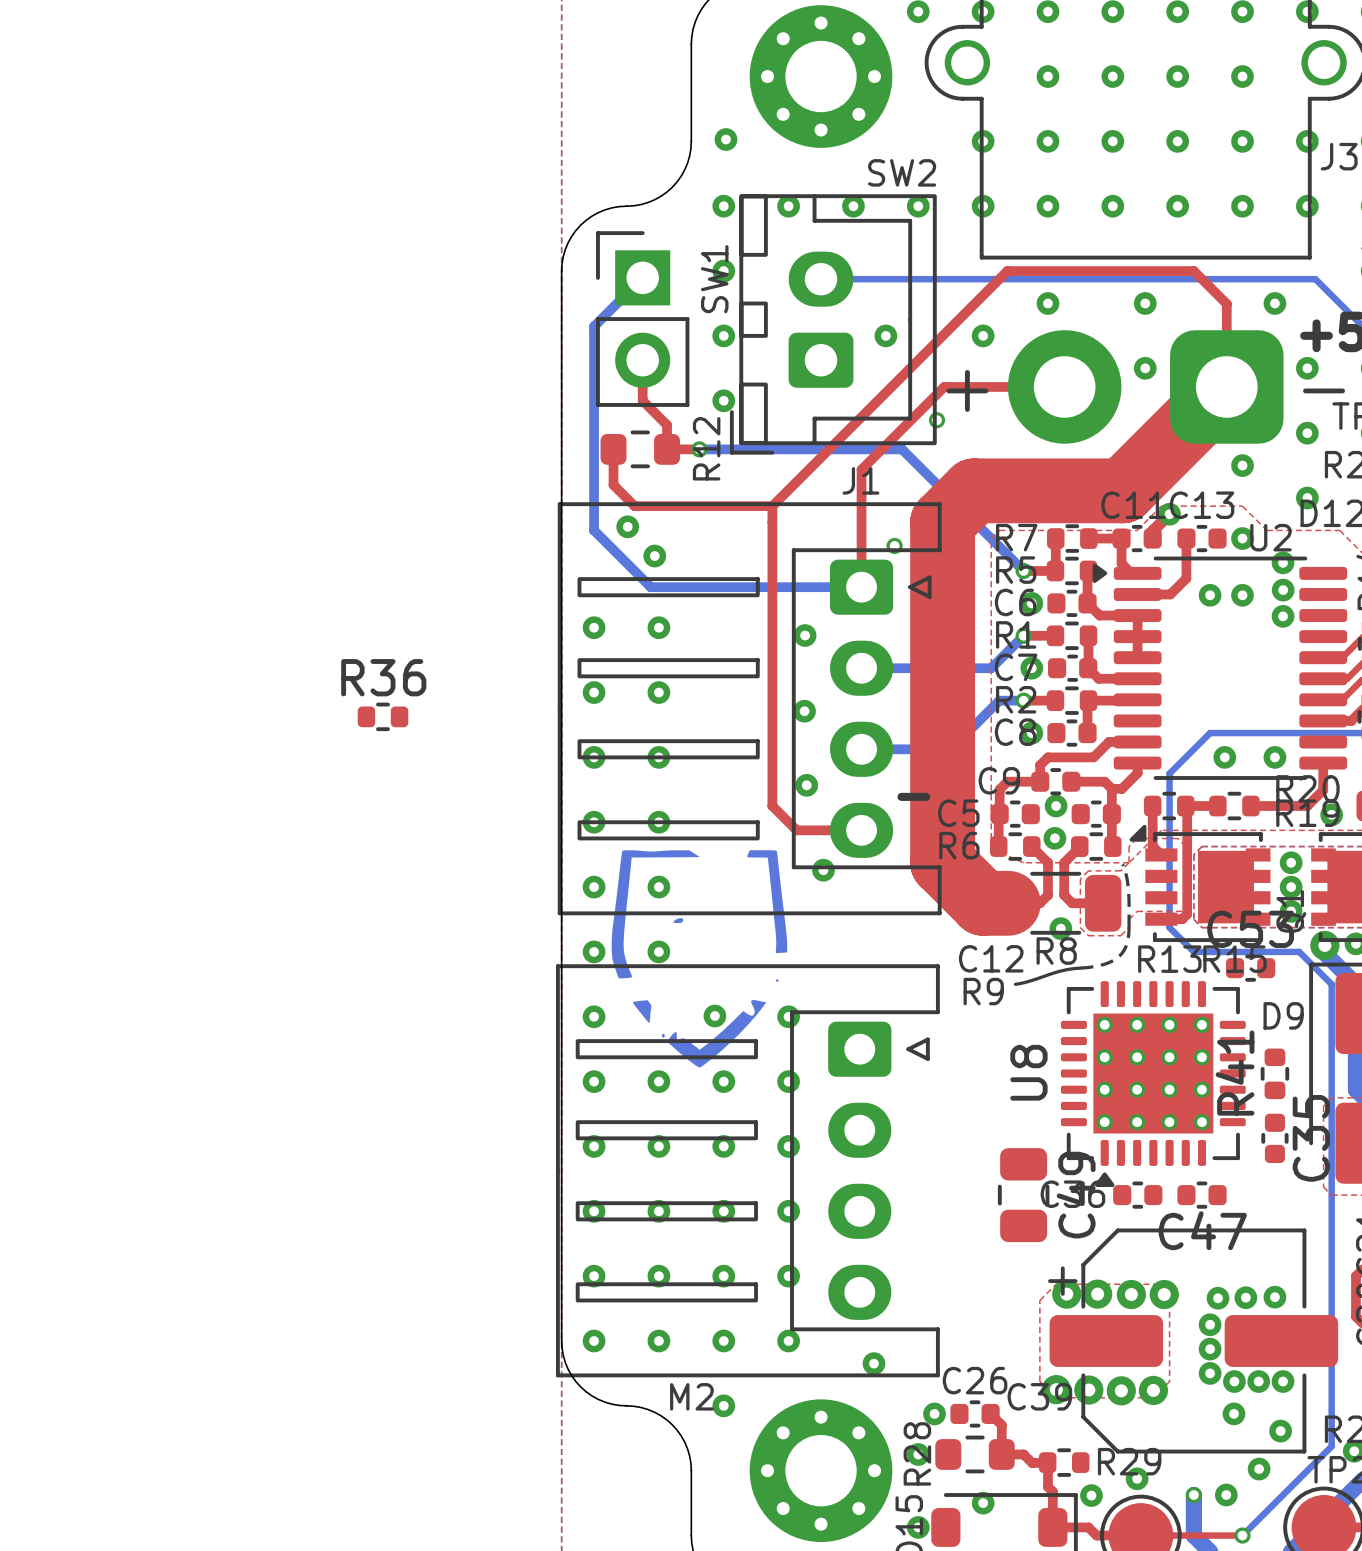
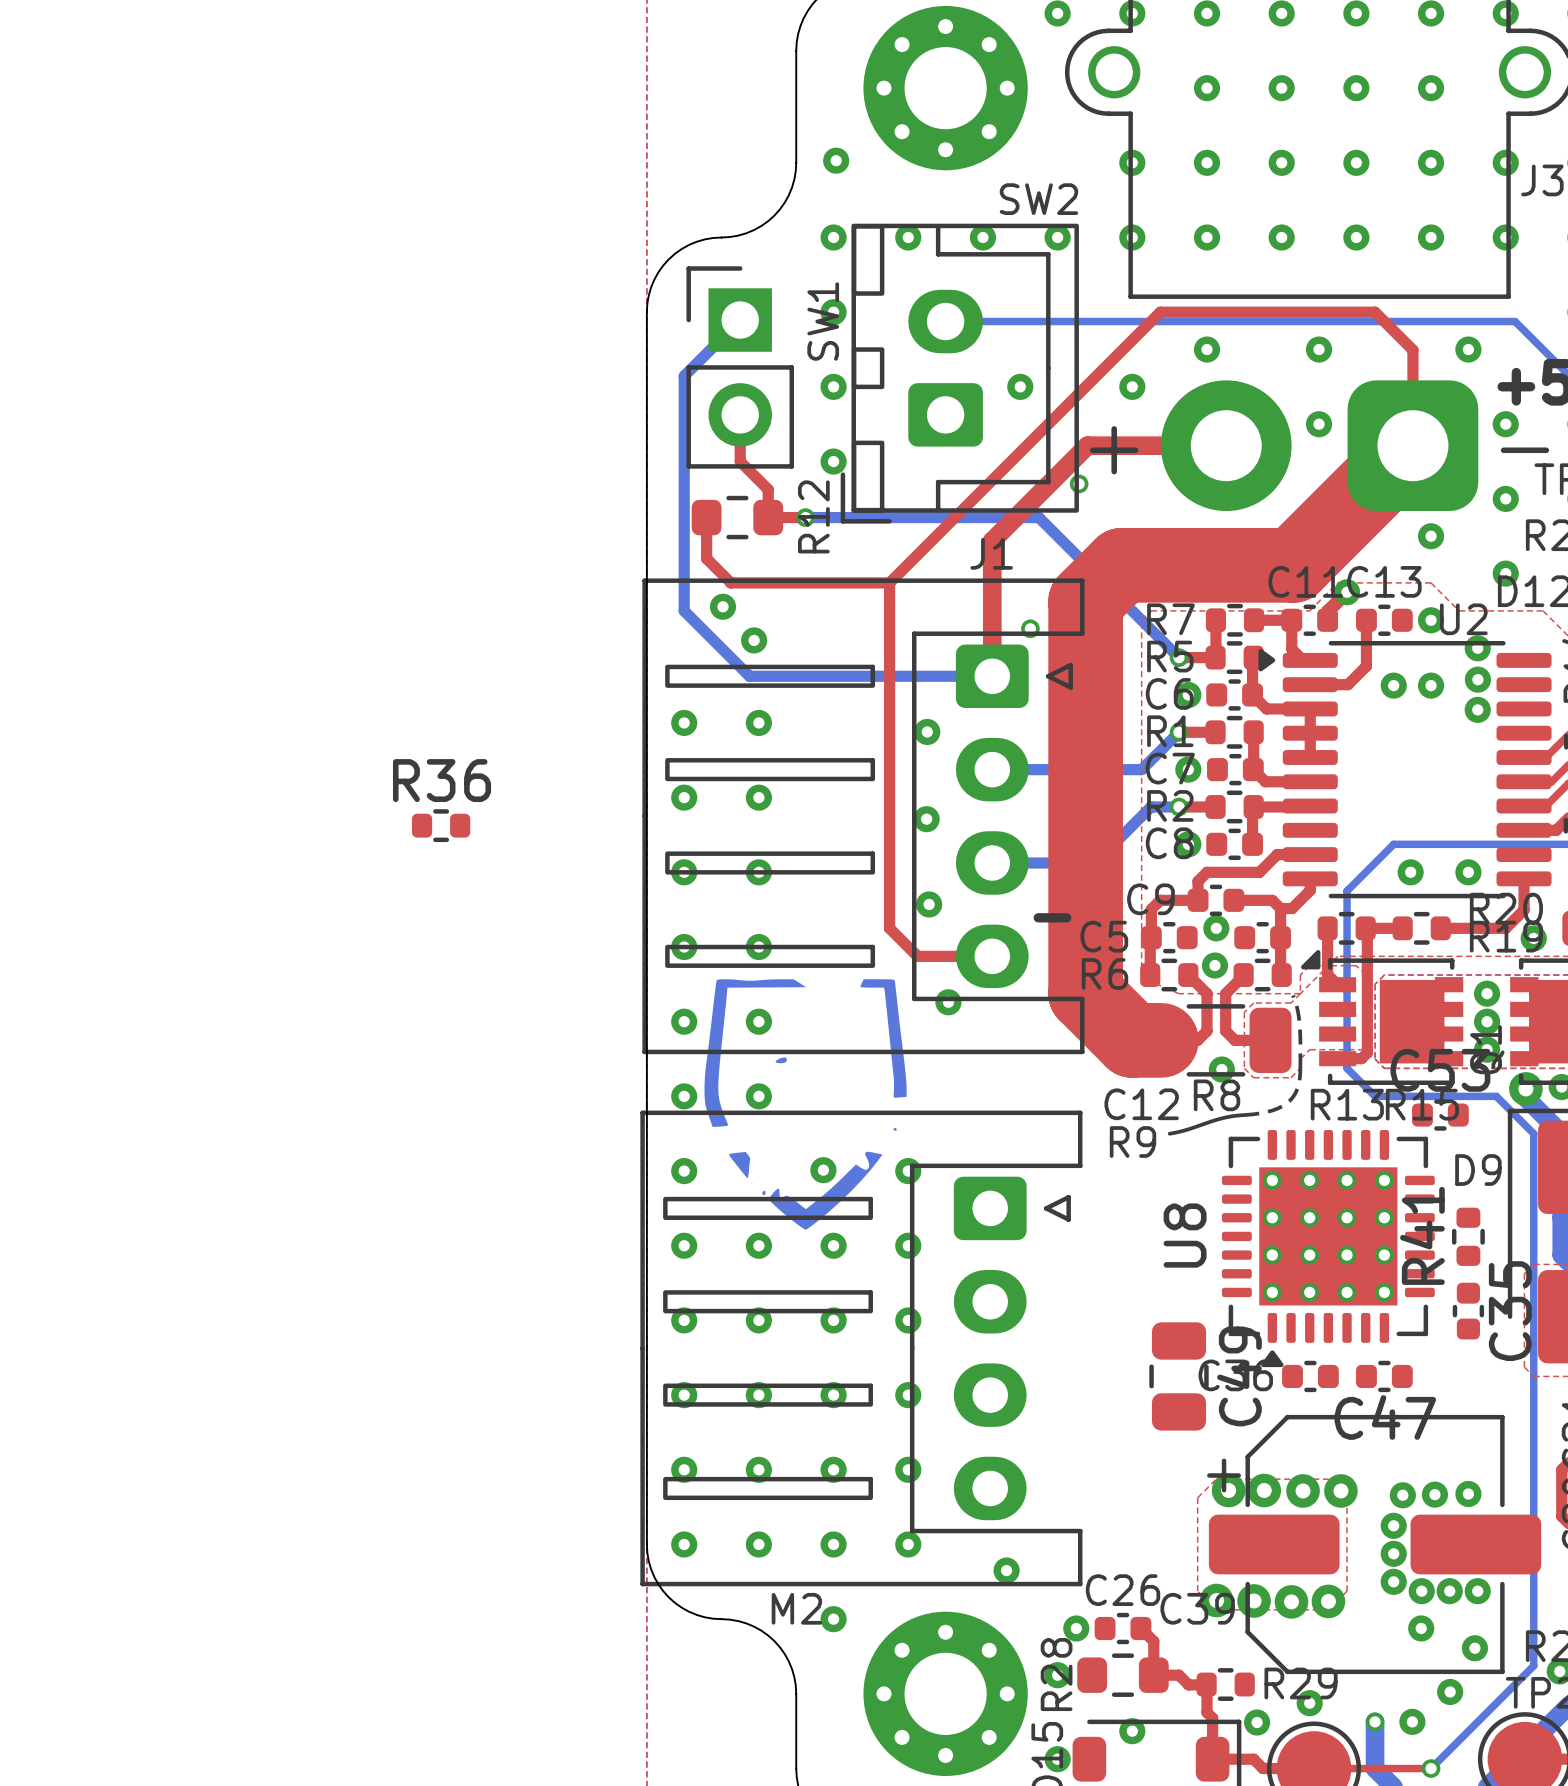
top track width: thin (1064, 386) (944, 386) (861, 469) (861, 587) -> thick (1226, 445) (1087, 445) (992, 540) (992, 676)

